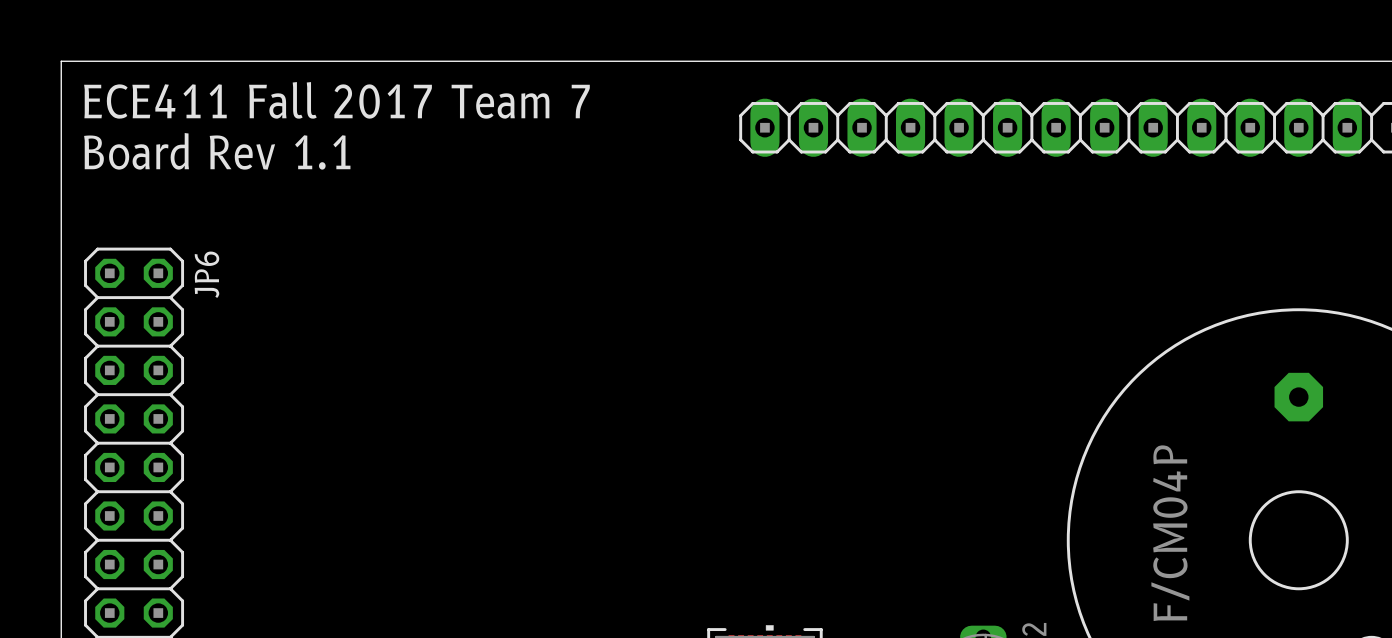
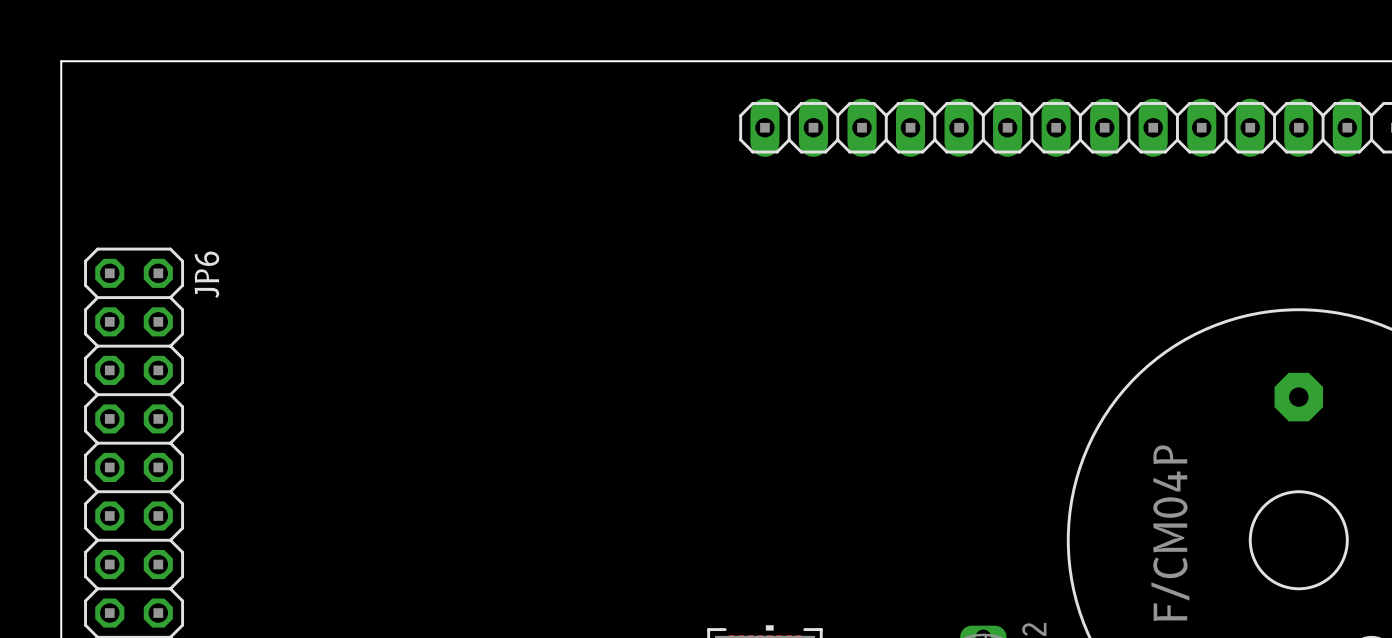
text: ECE411 Fall 2017 Team 7 (336, 100) -> none
text: Board Rev 1.1 (217, 151) -> none

